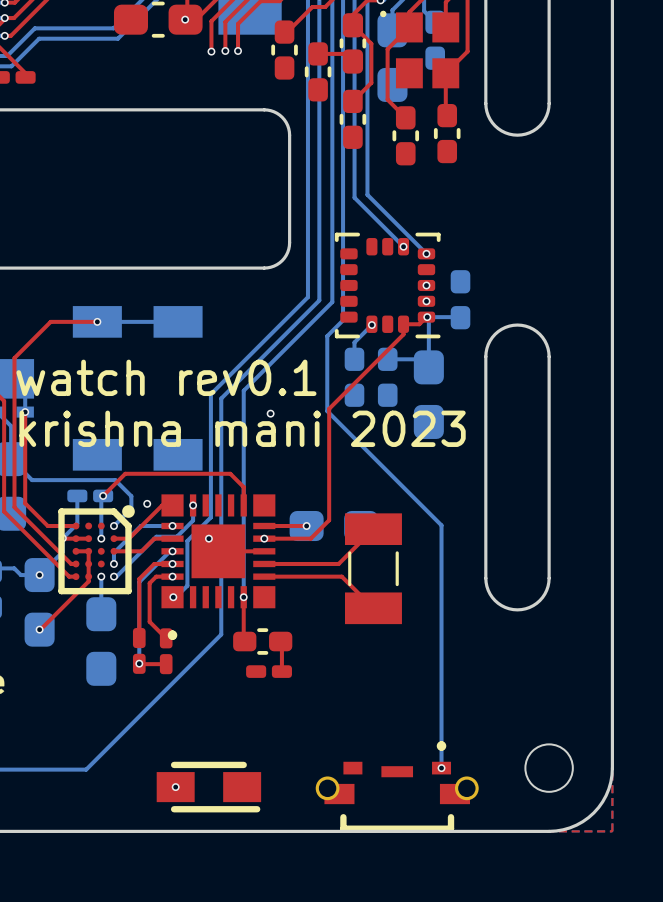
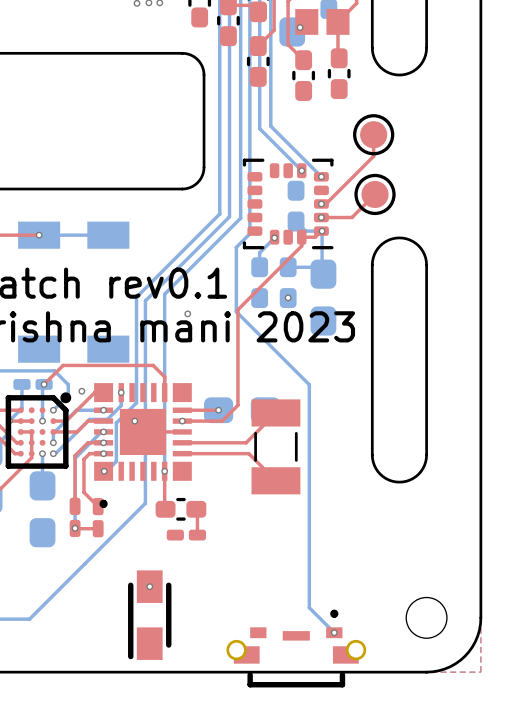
via: none -> (300, 27)
top track: none -> (373, 134) (373, 156) (325, 203) (321, 203)
part: none -> (373, 134)
top track: none -> (375, 194) (351, 217) (321, 217)
part: none -> (375, 194)
part position: (460, 299) -> (296, 206)
bottom track: (460, 317) (427, 317) (428, 318) (428, 367) (420, 359) -> (296, 221) (305, 231) (322, 231) (322, 268) (320, 270) (316, 267)
via: none -> (288, 297)
bottom track: (412, 496) (441, 525) (441, 768) -> (309, 384) (309, 607) (334, 632)
via position: (441, 768) -> (334, 632)
part position: (397, 786) -> (296, 648)
via position: (175, 787) -> (149, 586)
part rotation: 0° (208, 787) -> 90° clockwise (149, 615)

